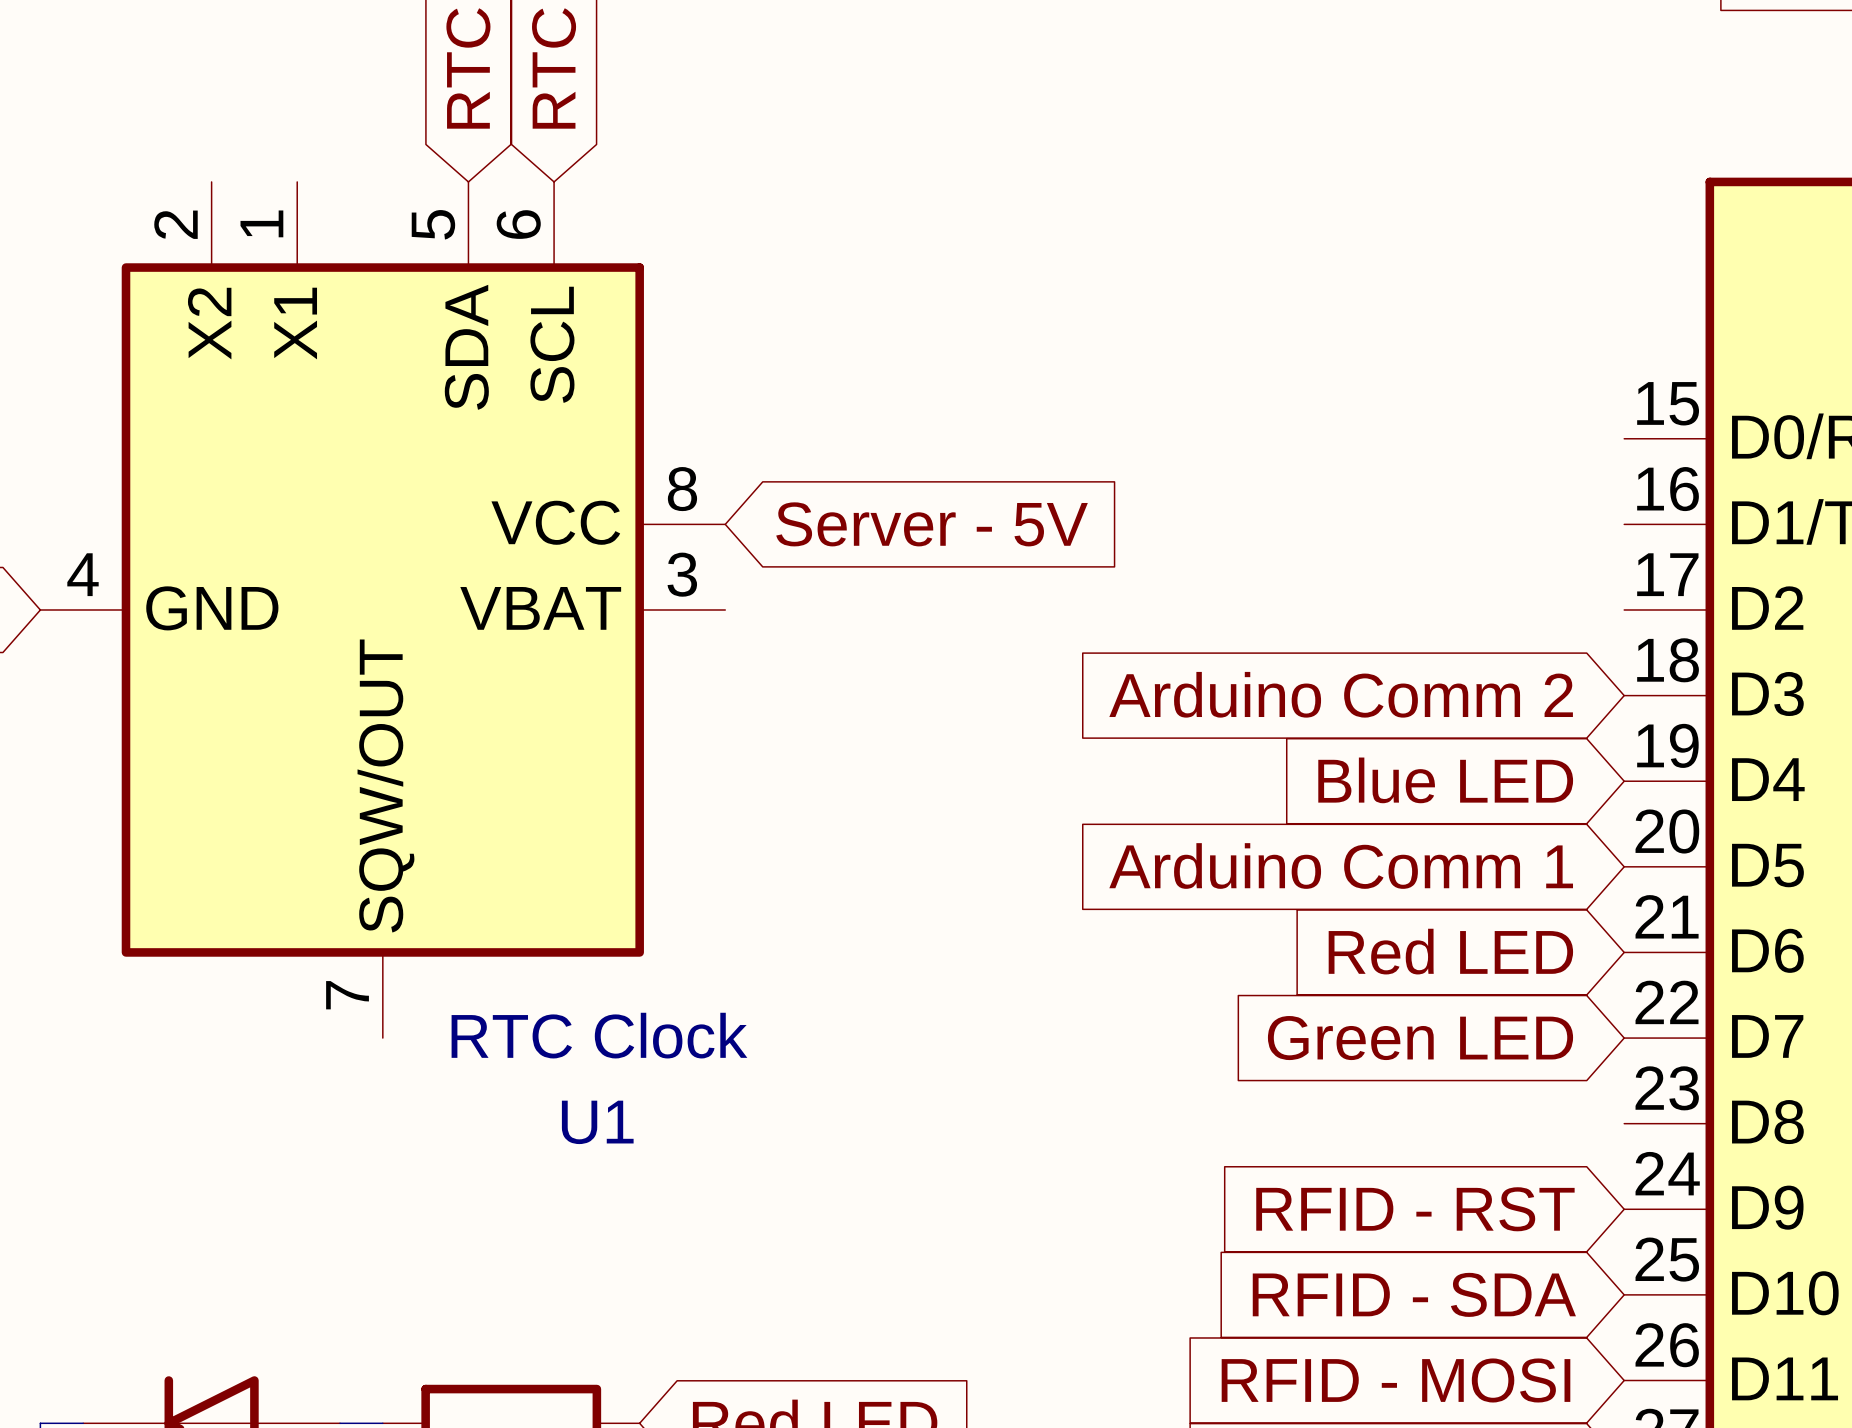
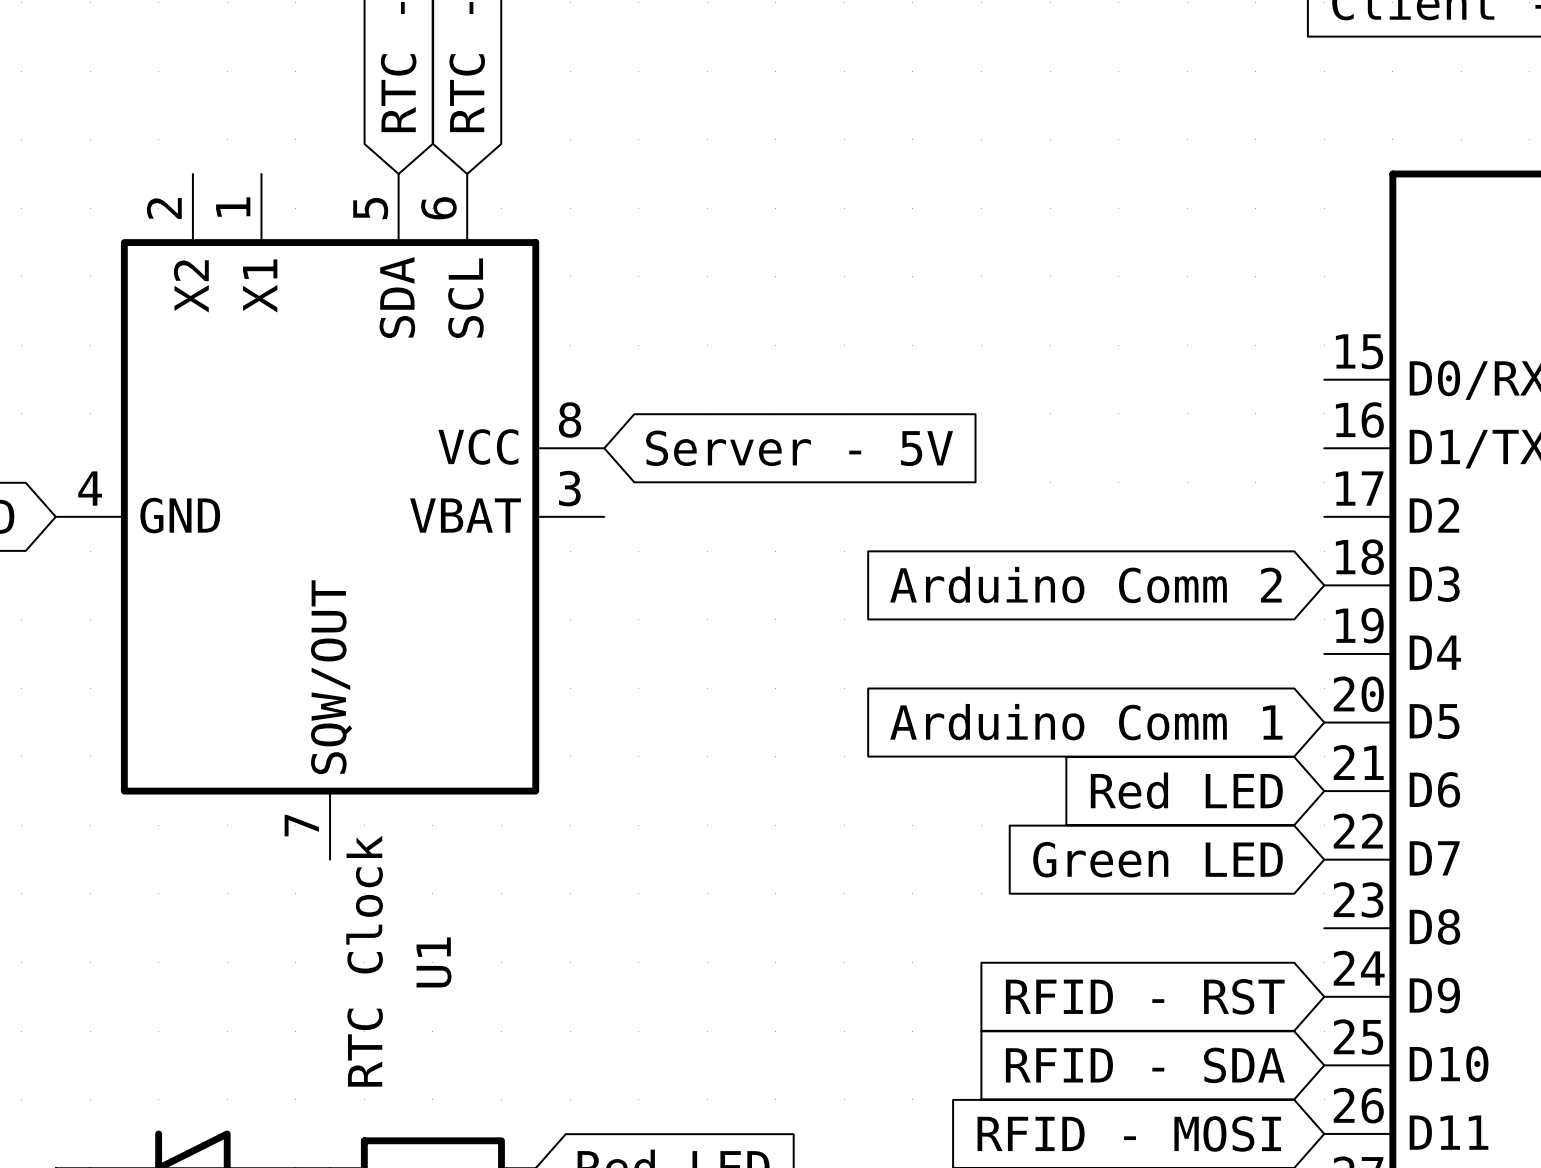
global label: Blue LED (1445, 780) -> none
U1 value rotation: 0° (599, 1035) -> 90° counterclockwise (364, 961)
U1 name rotation: 0° (597, 1122) -> 90° counterclockwise (434, 962)

